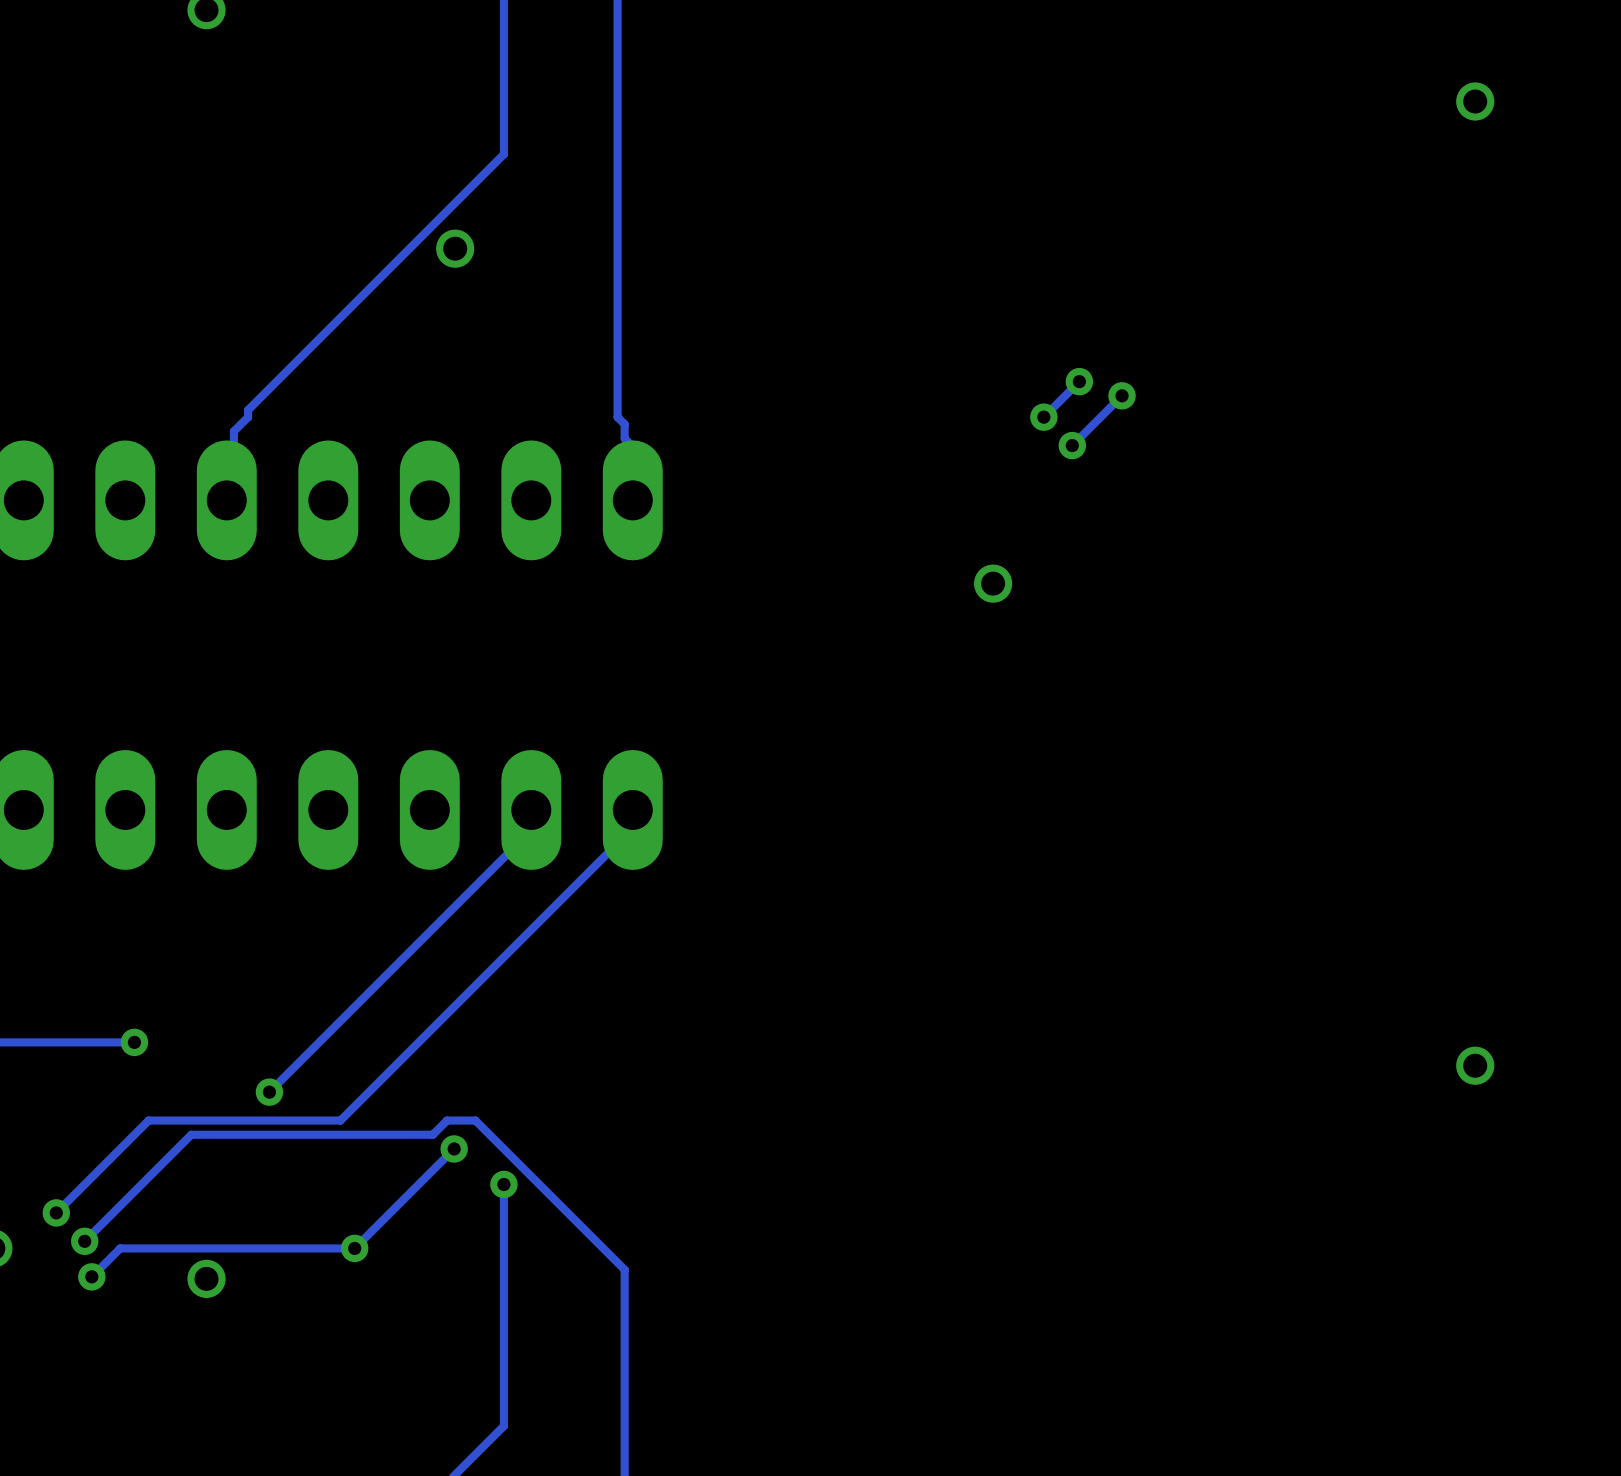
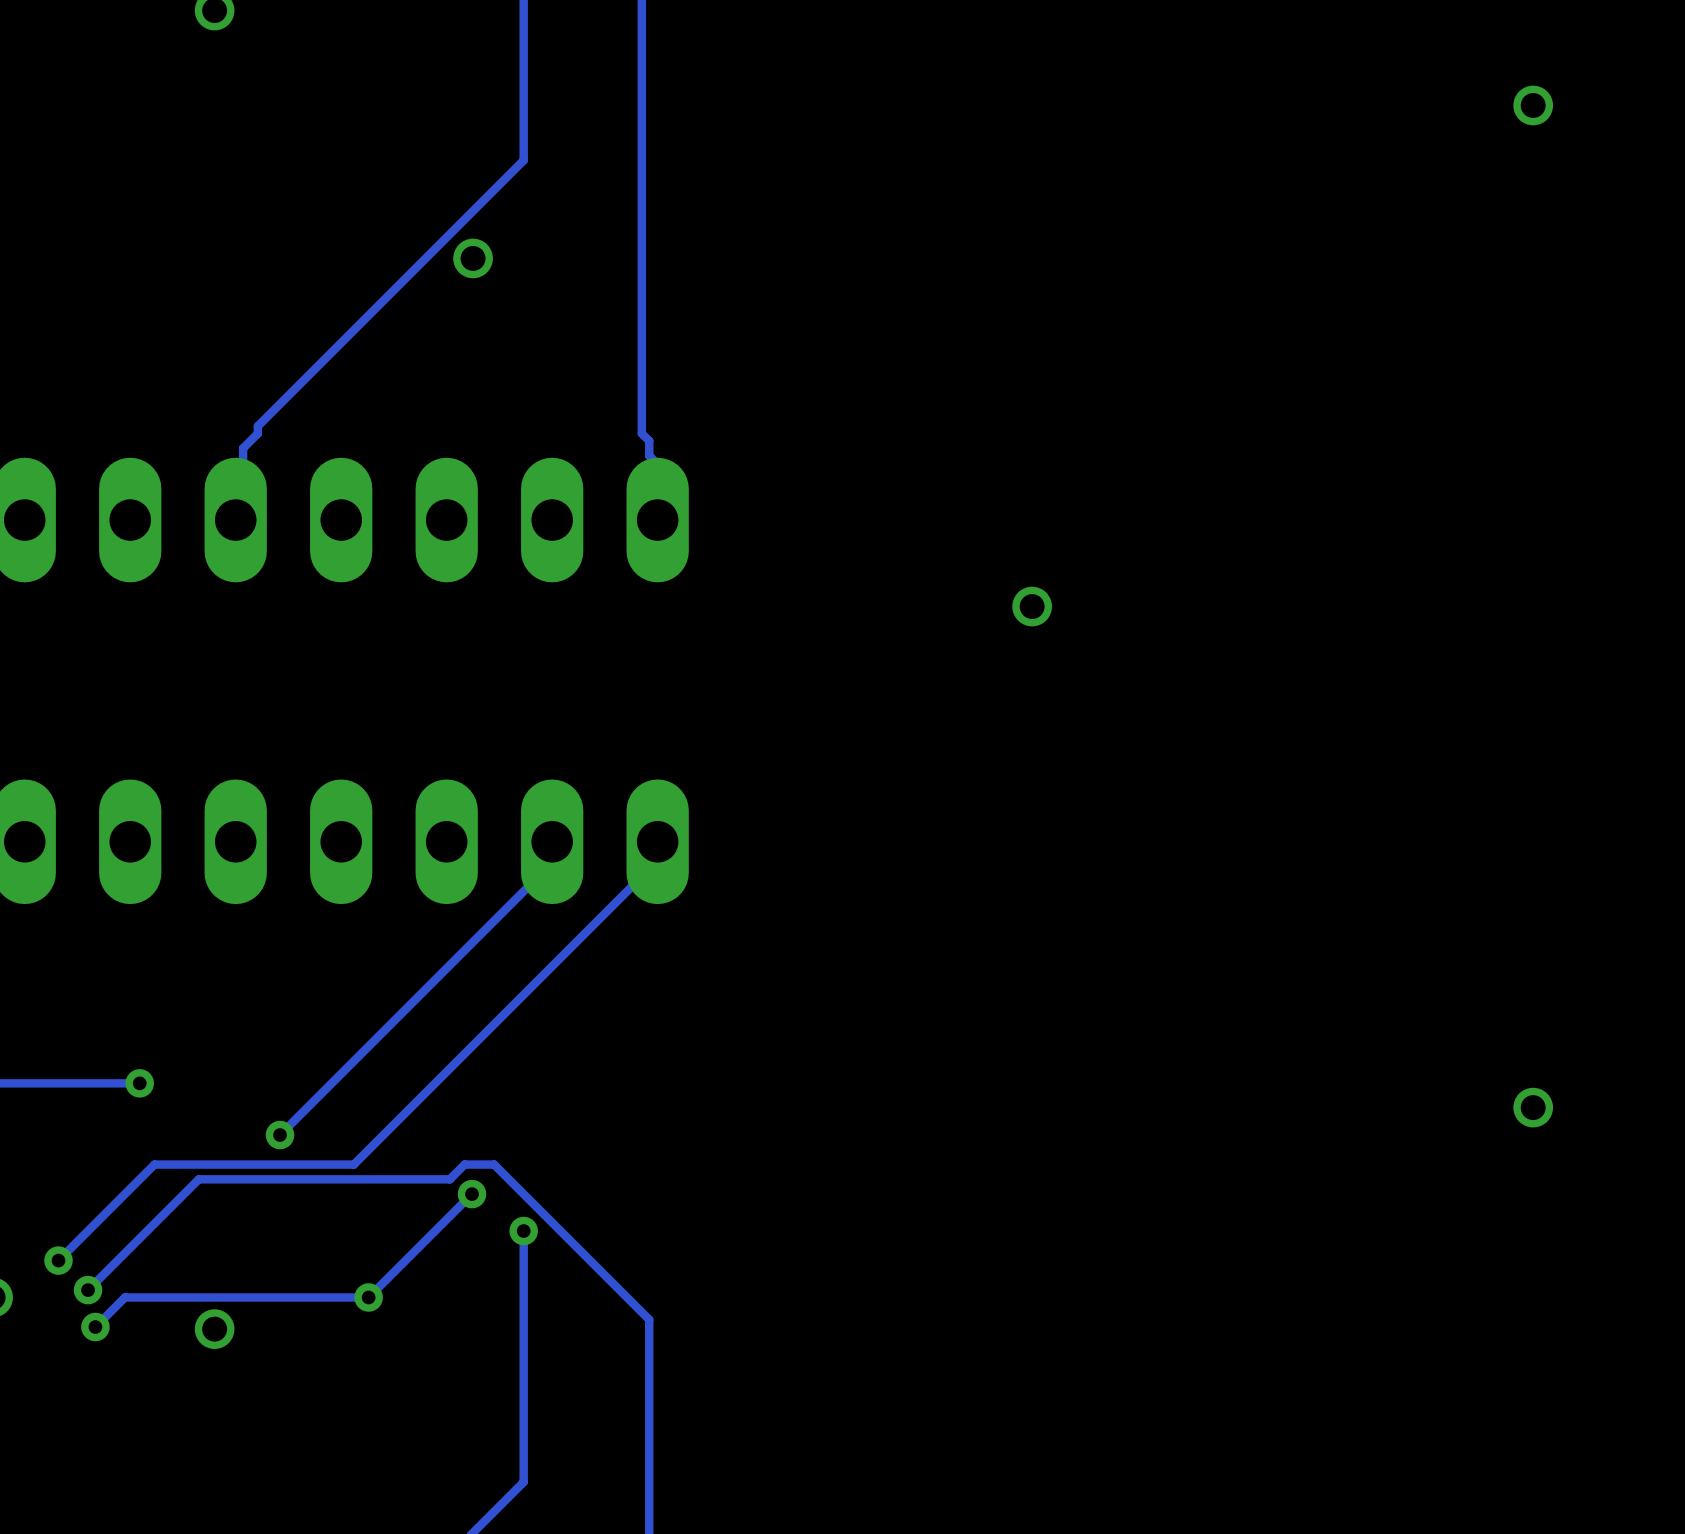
track: (1079, 381) (1043, 417) -> none
via: (1079, 381) -> none
track: (1122, 395) (1072, 445) -> none
via: (1122, 395) -> none
via: (1043, 417) -> none
via: (1072, 445) -> none

